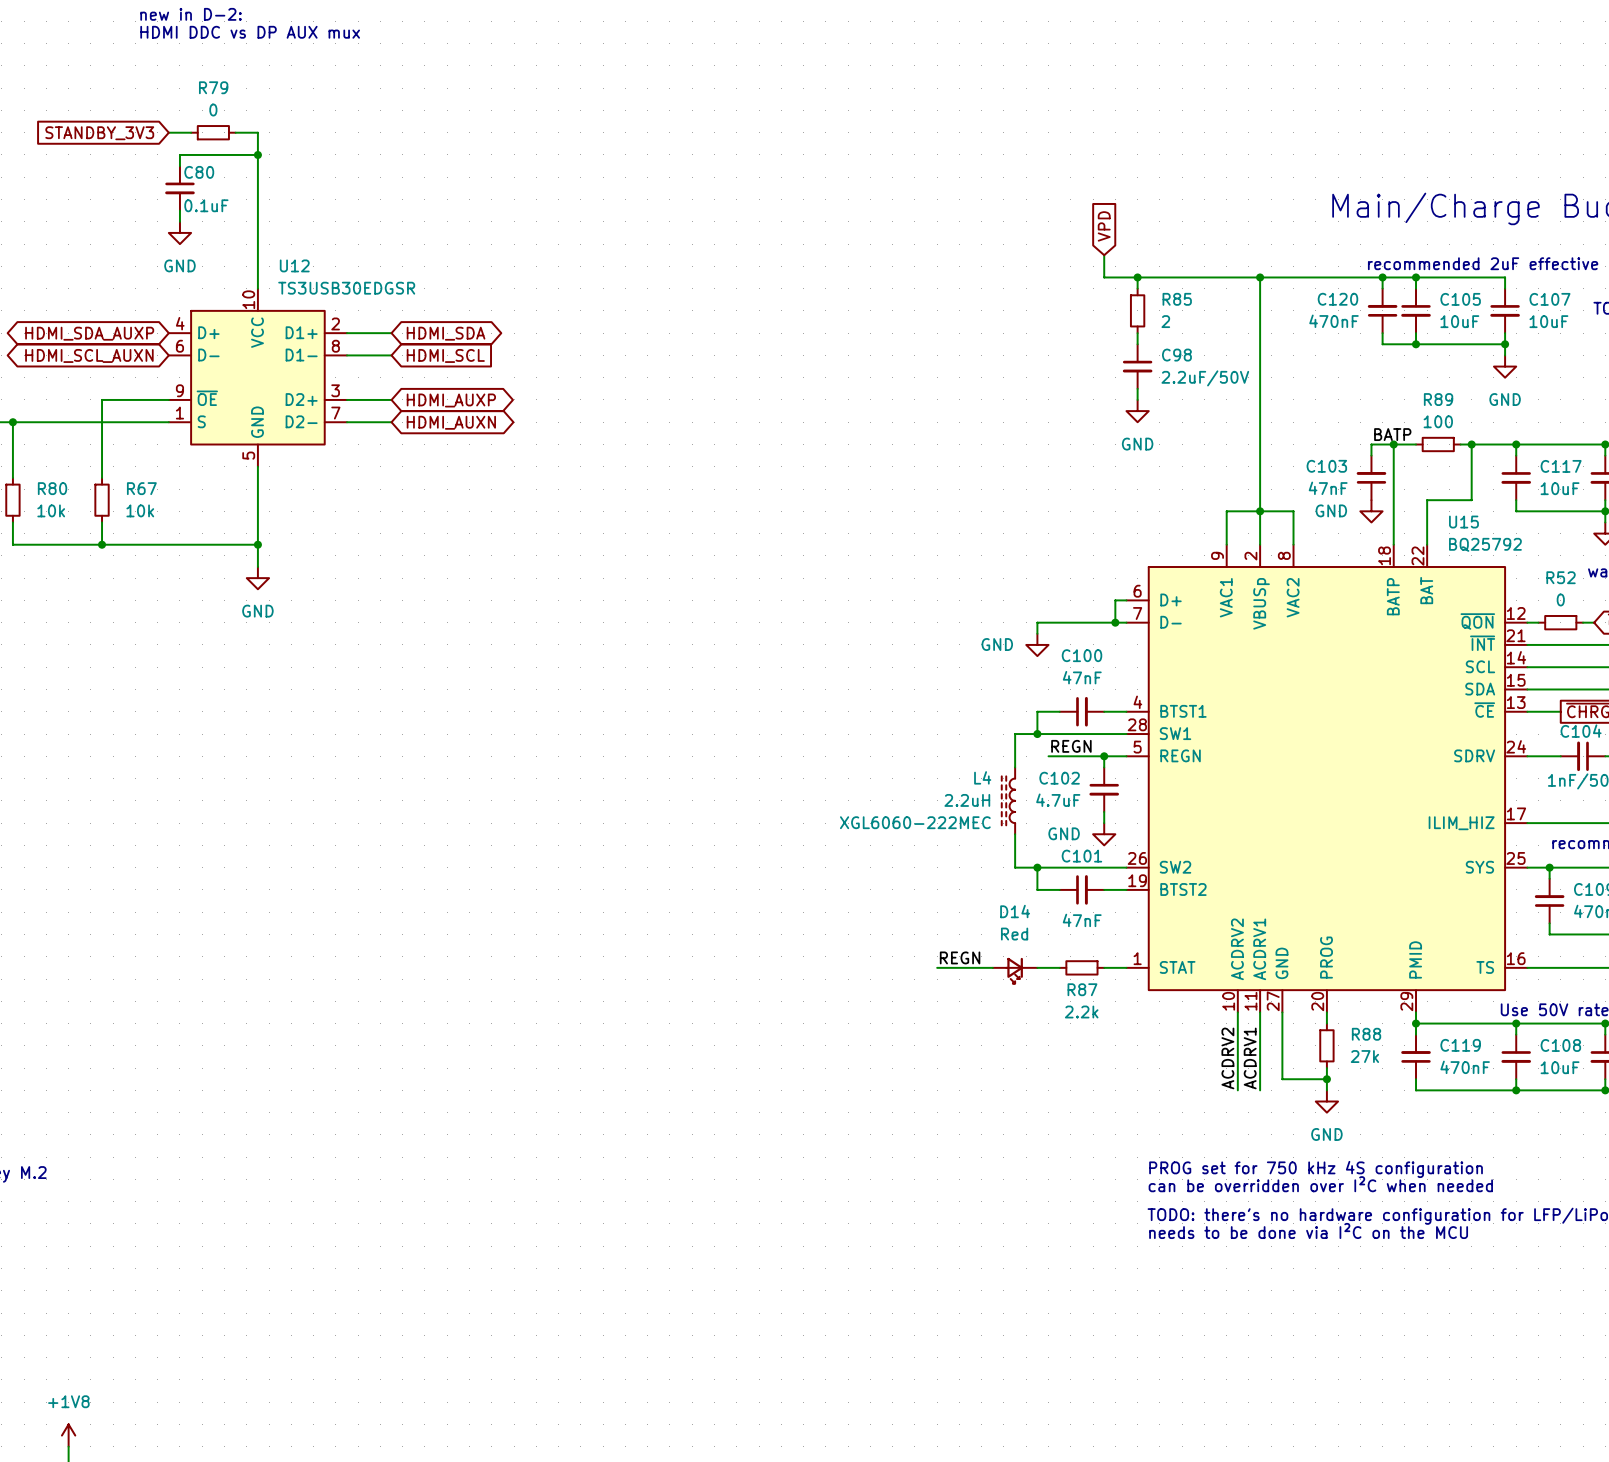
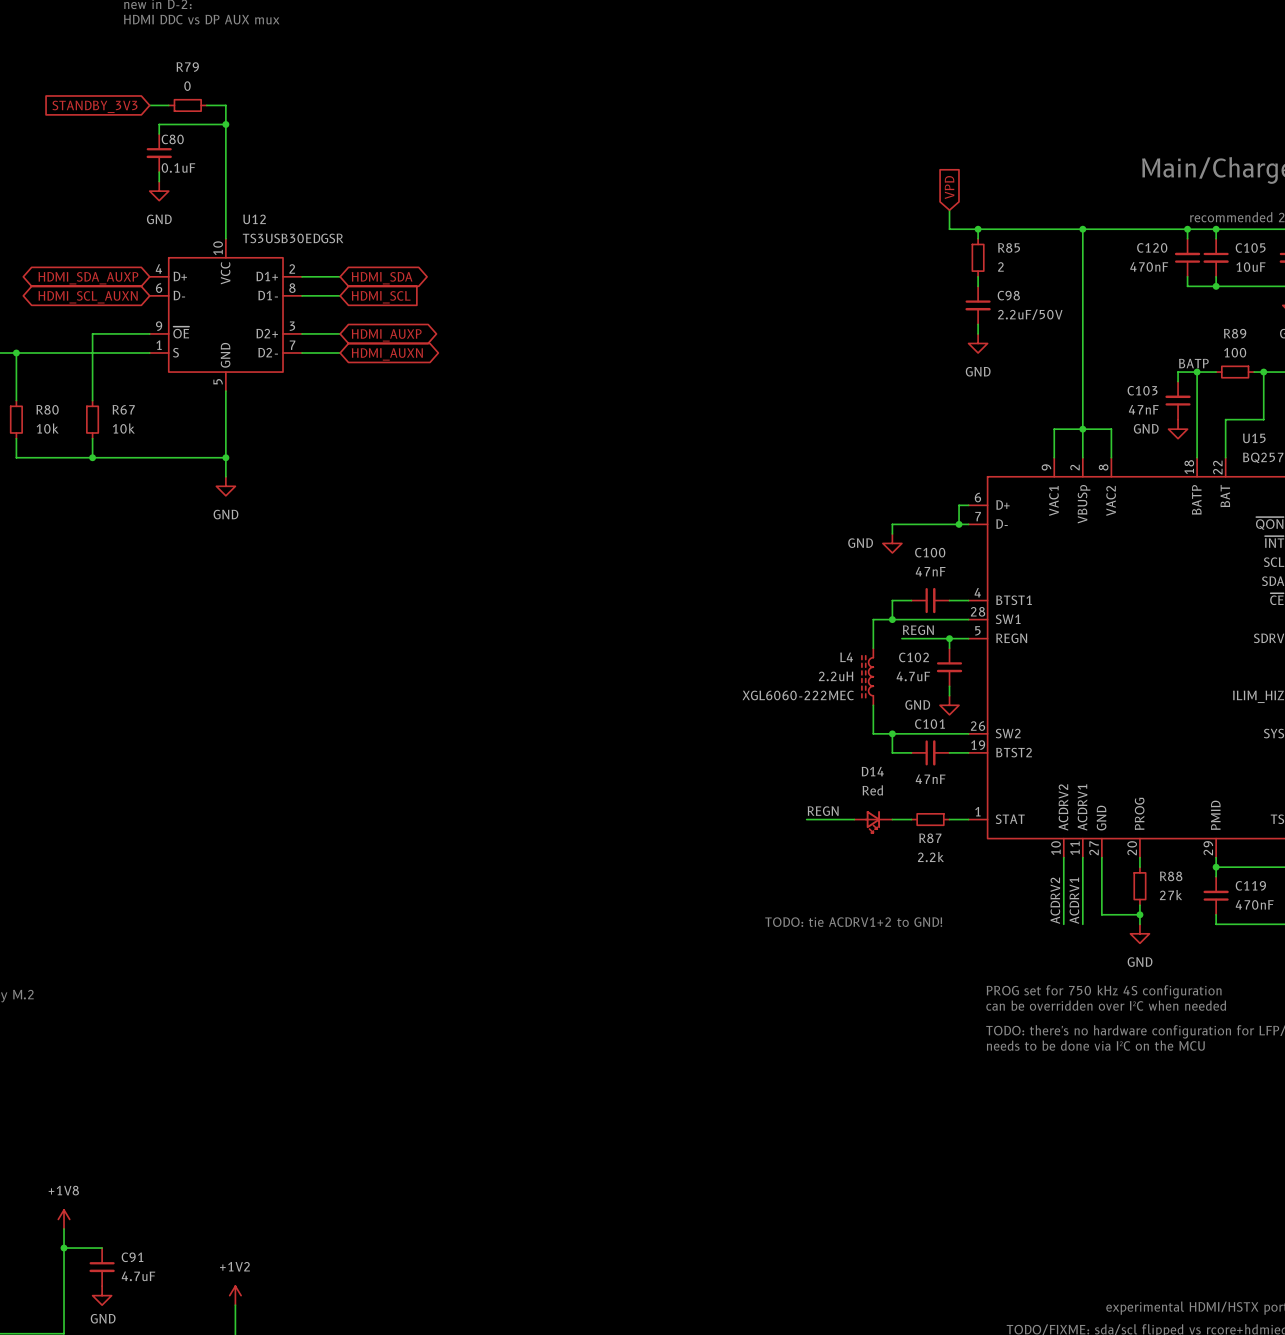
text: none -> TODO: tie ACDRV1+2 to GND! (853, 922)

